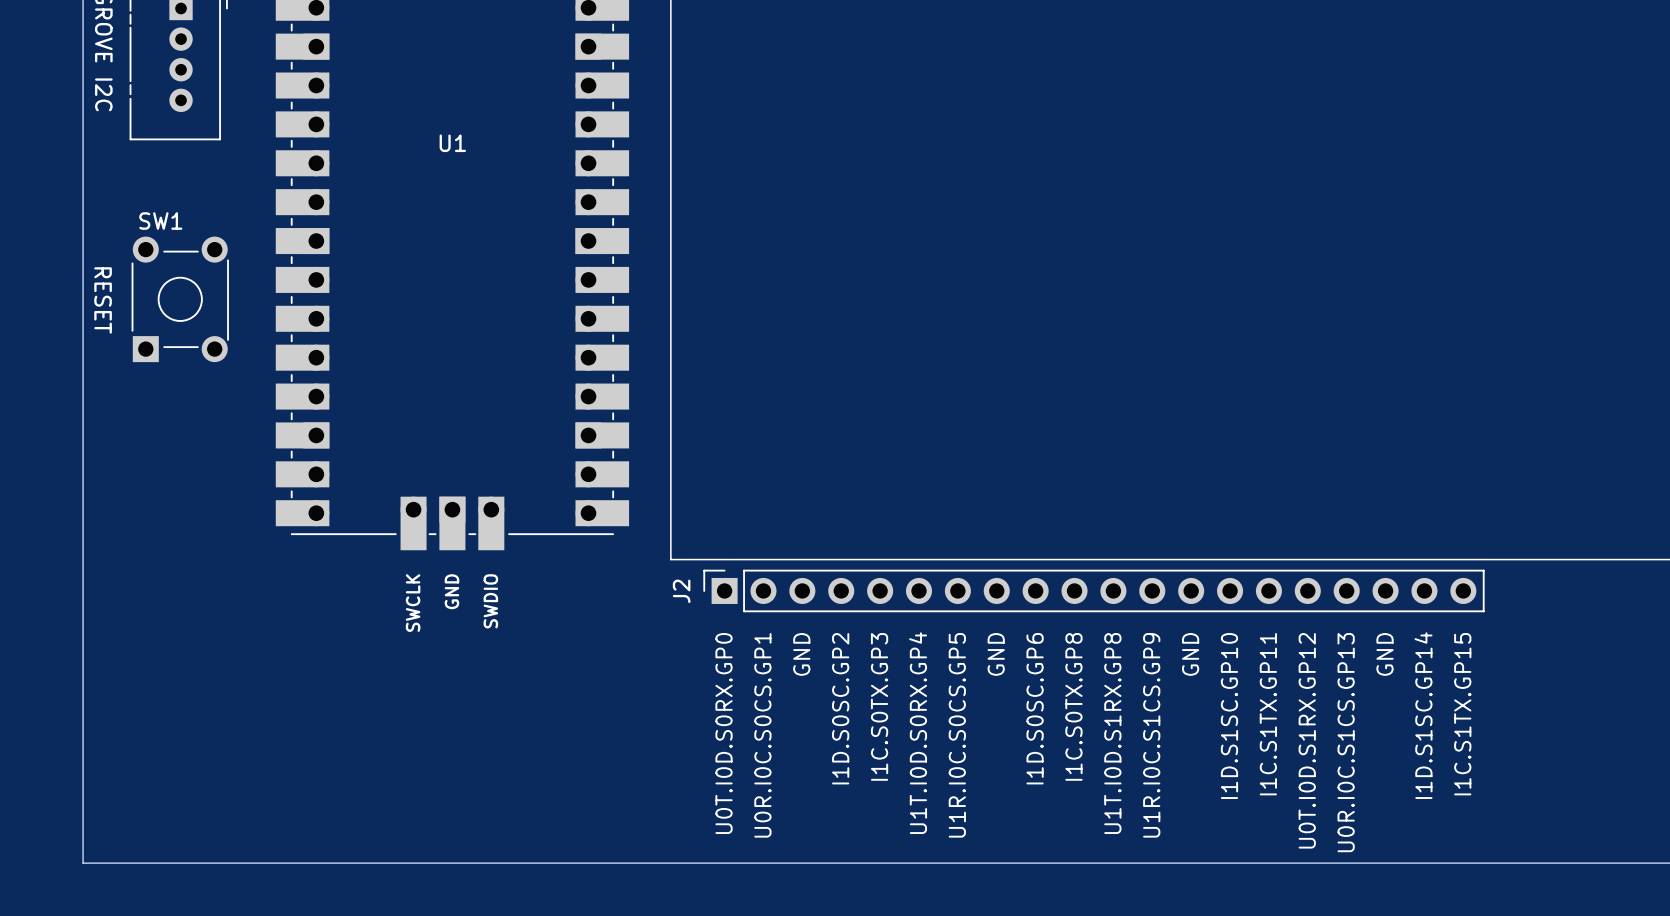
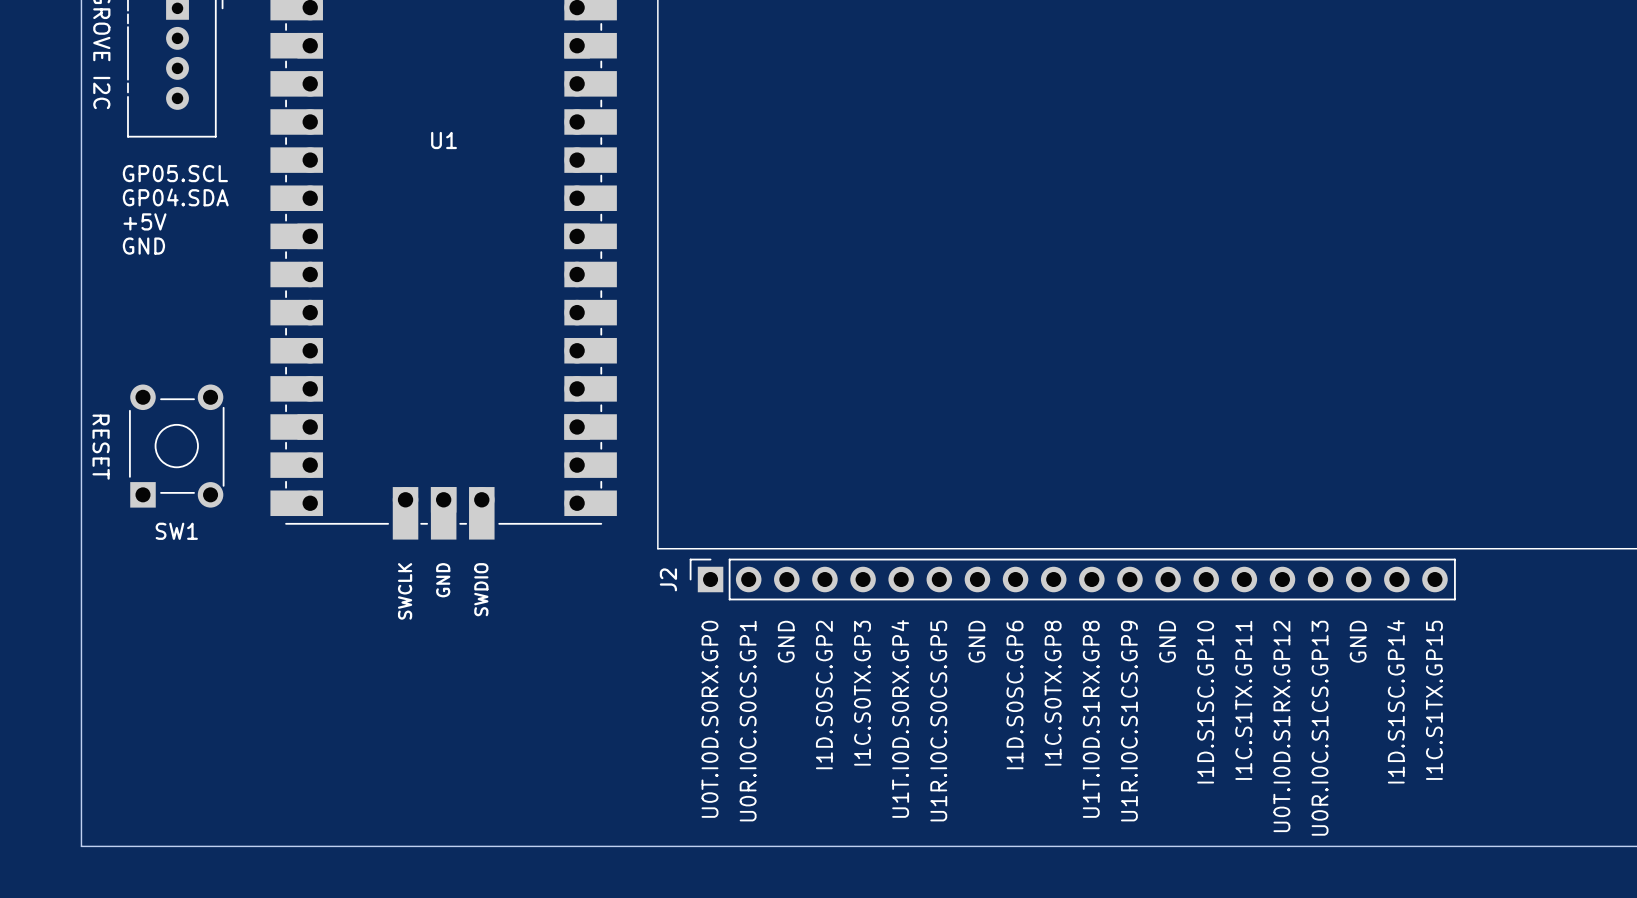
text: none -> GP05.SCL (175, 173)
text: none -> GP04.SDA (175, 197)
SW1 name position: SW1 (160, 221) -> SW1 (176, 531)
text: none -> +5V (145, 221)
text: none -> GND (143, 246)
SW1 position: (180, 299) -> (176, 446)

